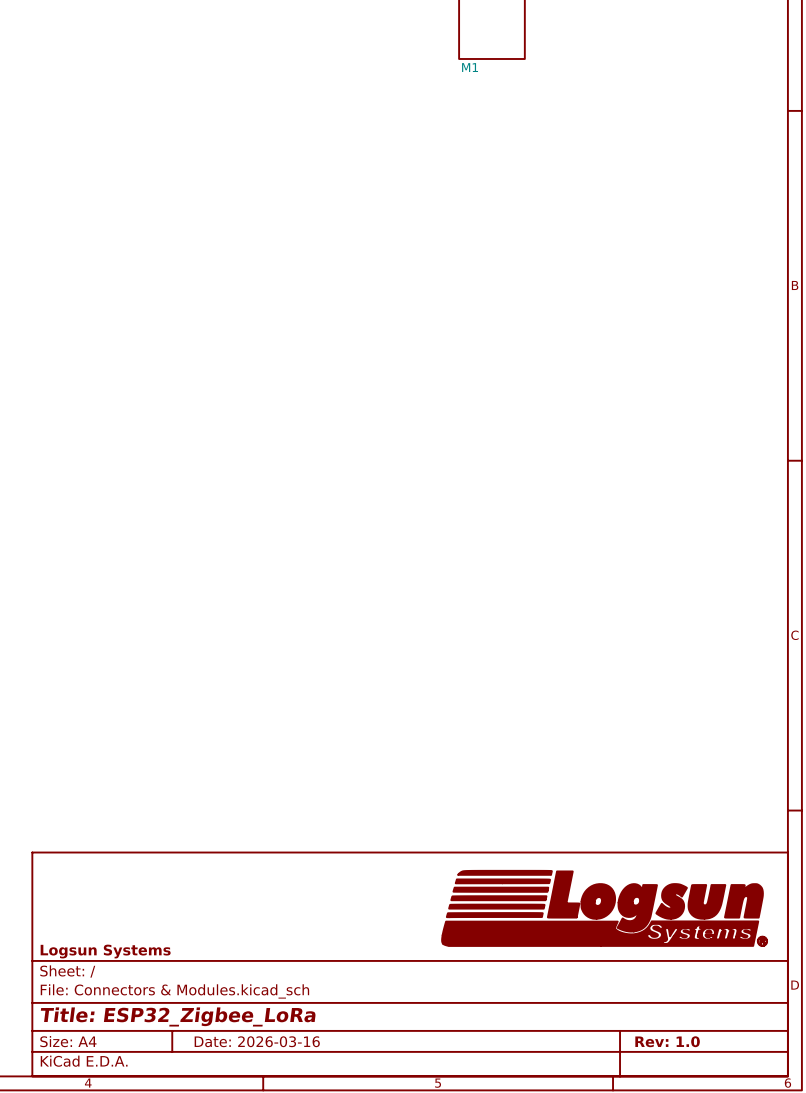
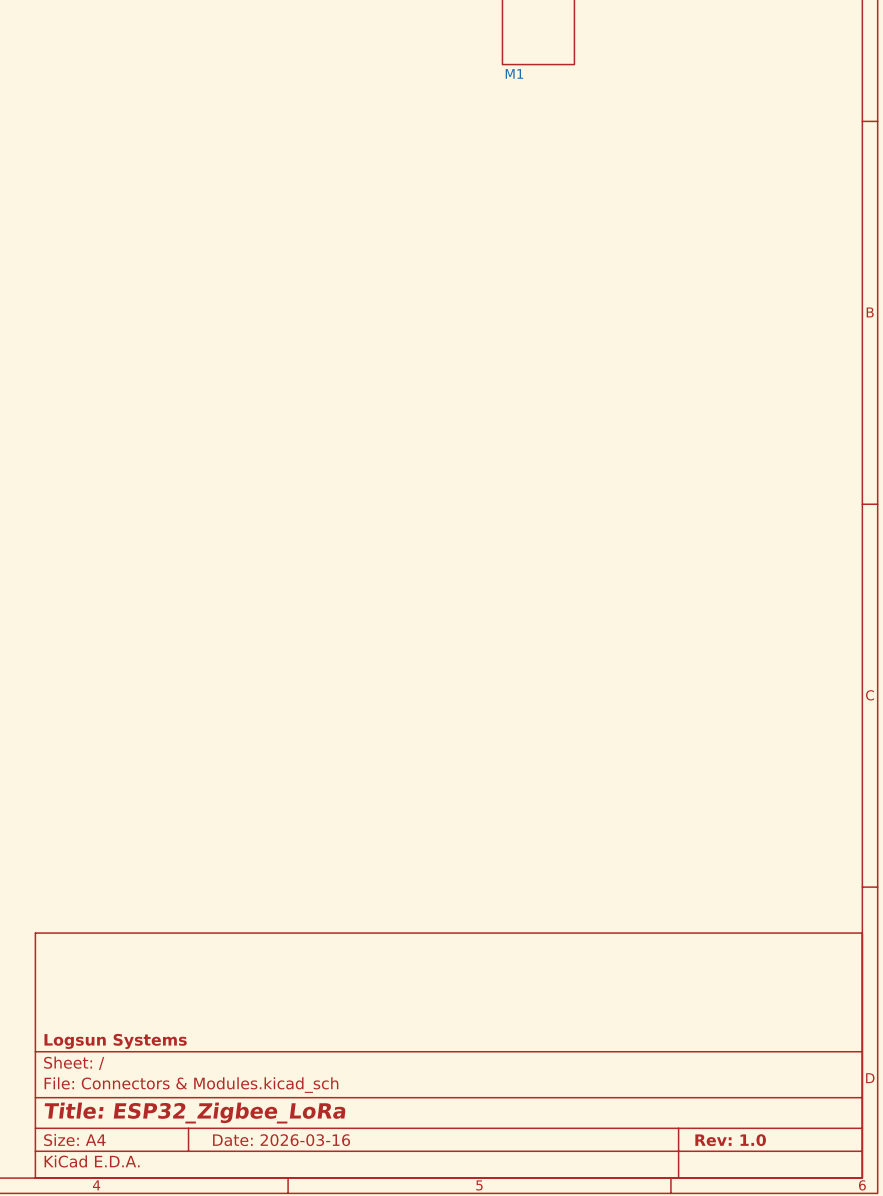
power symbol: (604, 908) -> none

